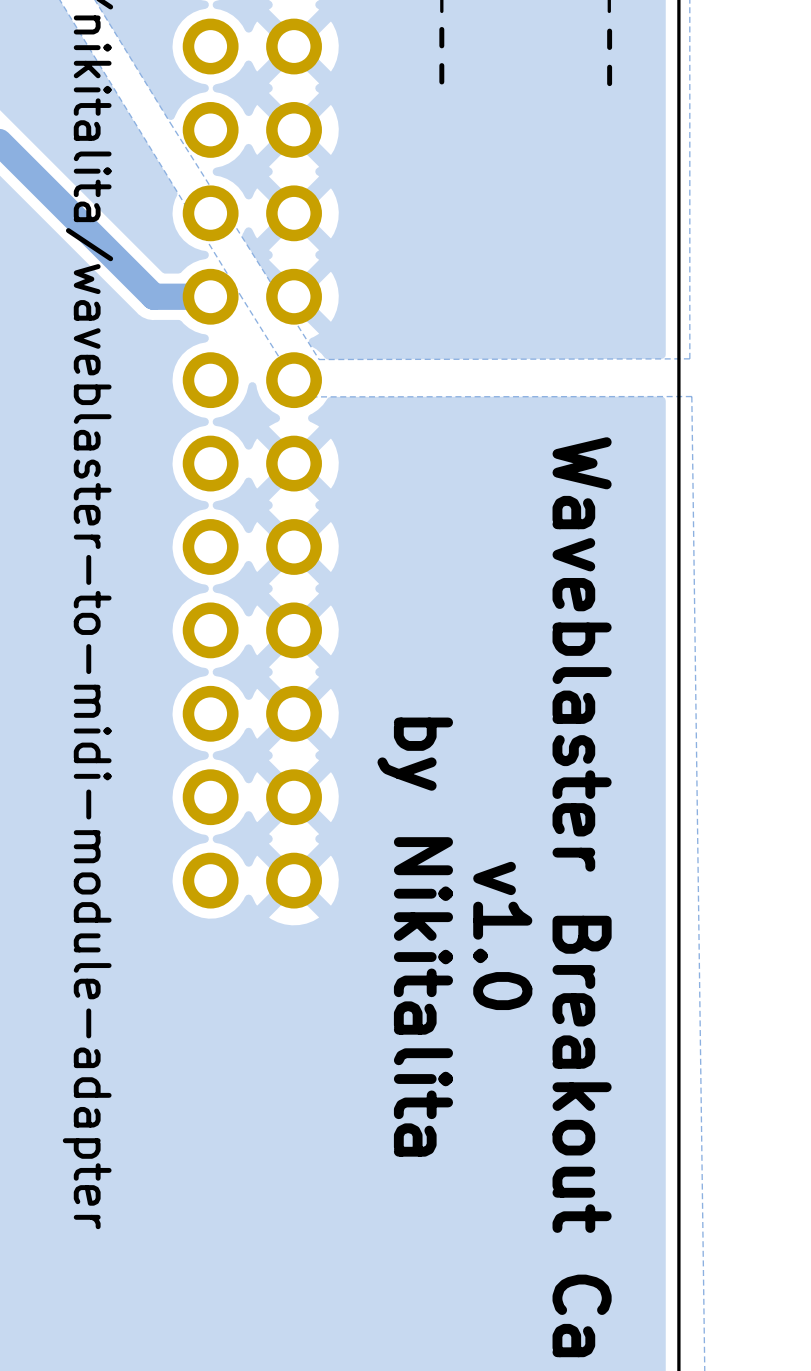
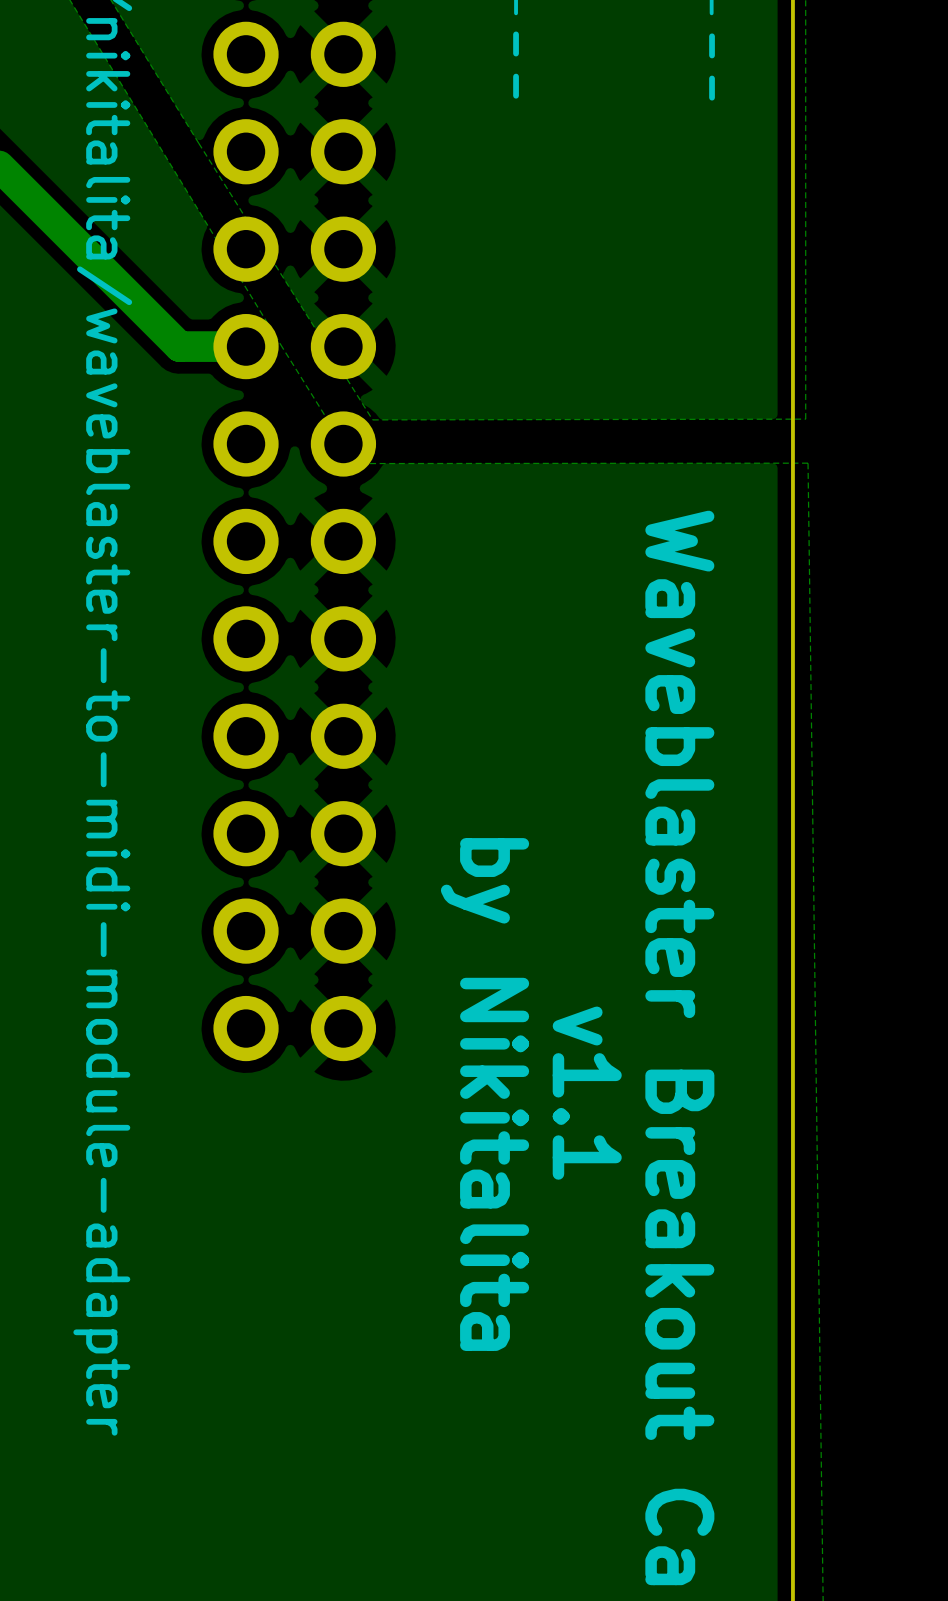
text: v1.0 (502, 935) -> v1.1 (587, 1093)

